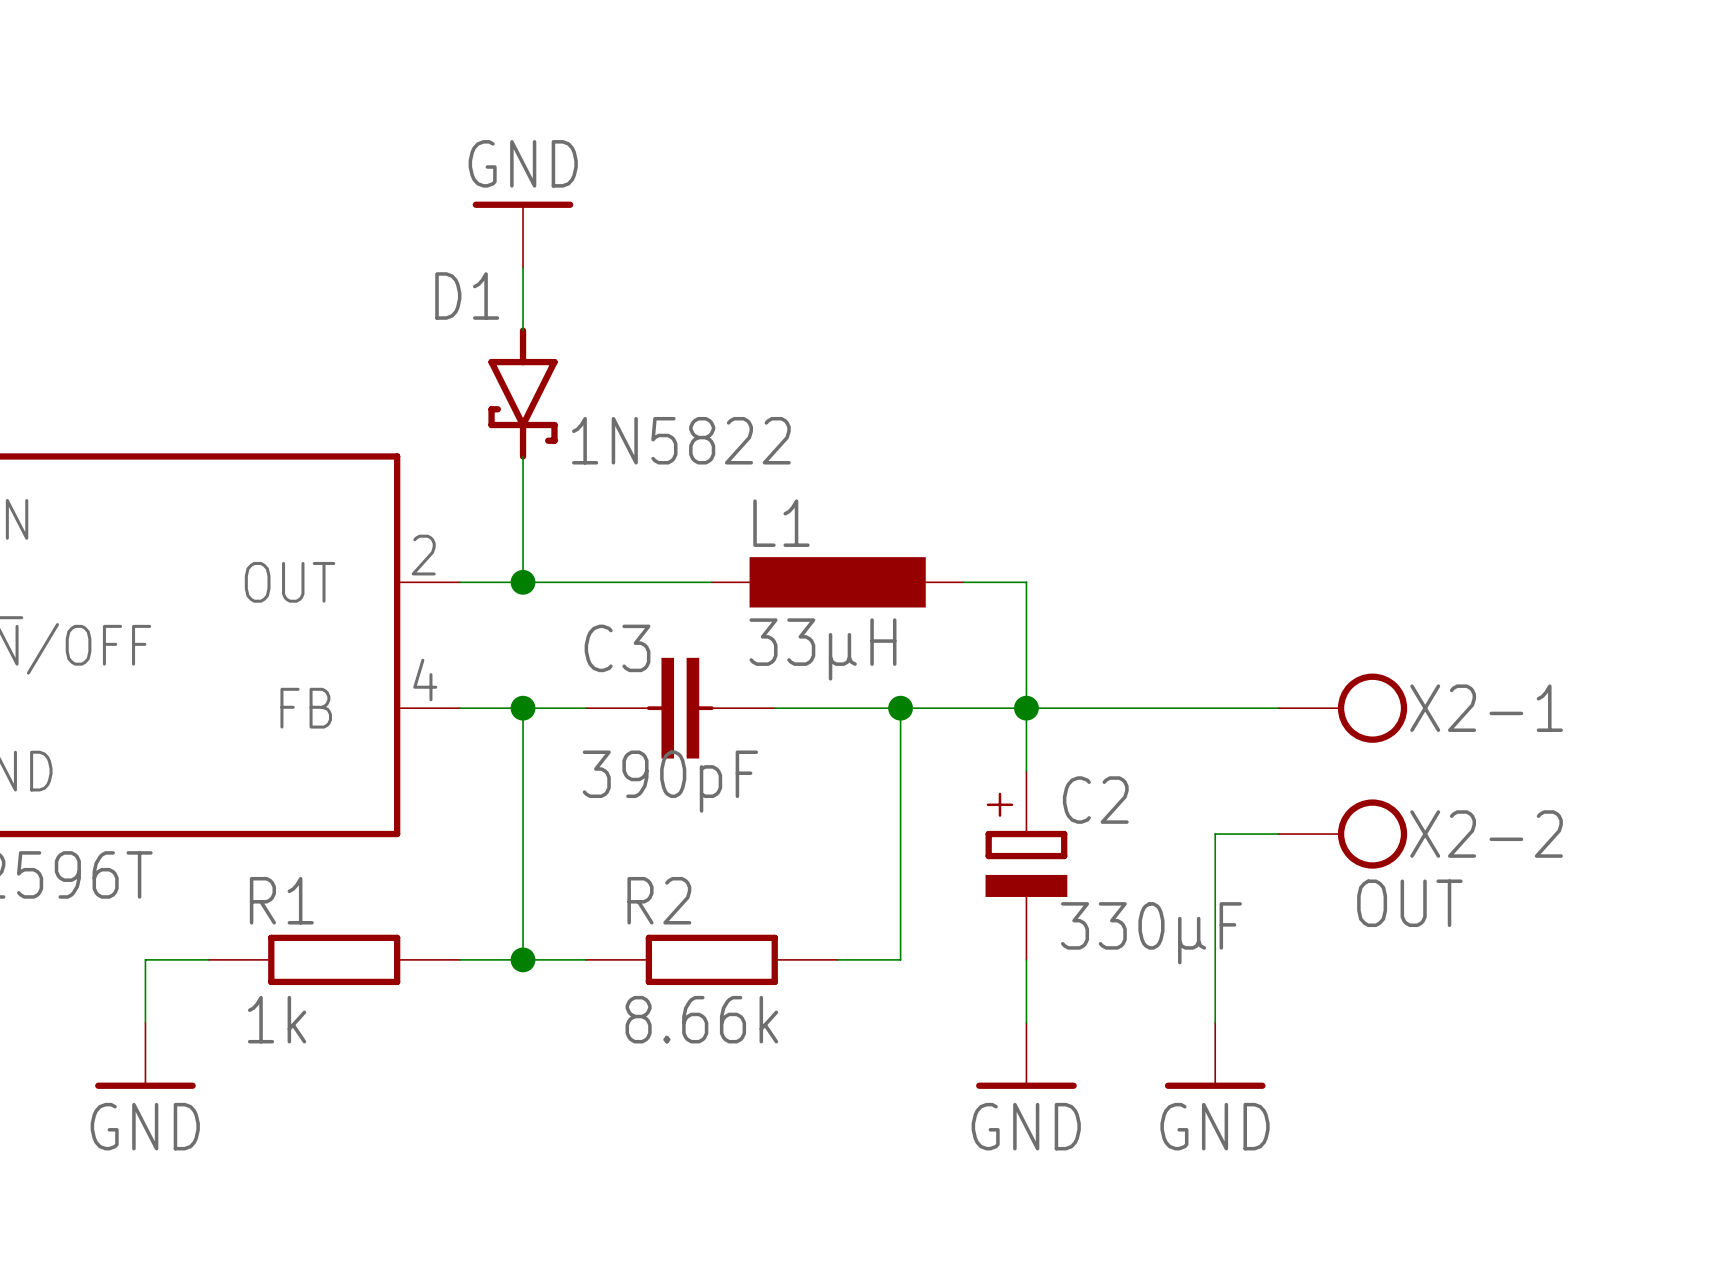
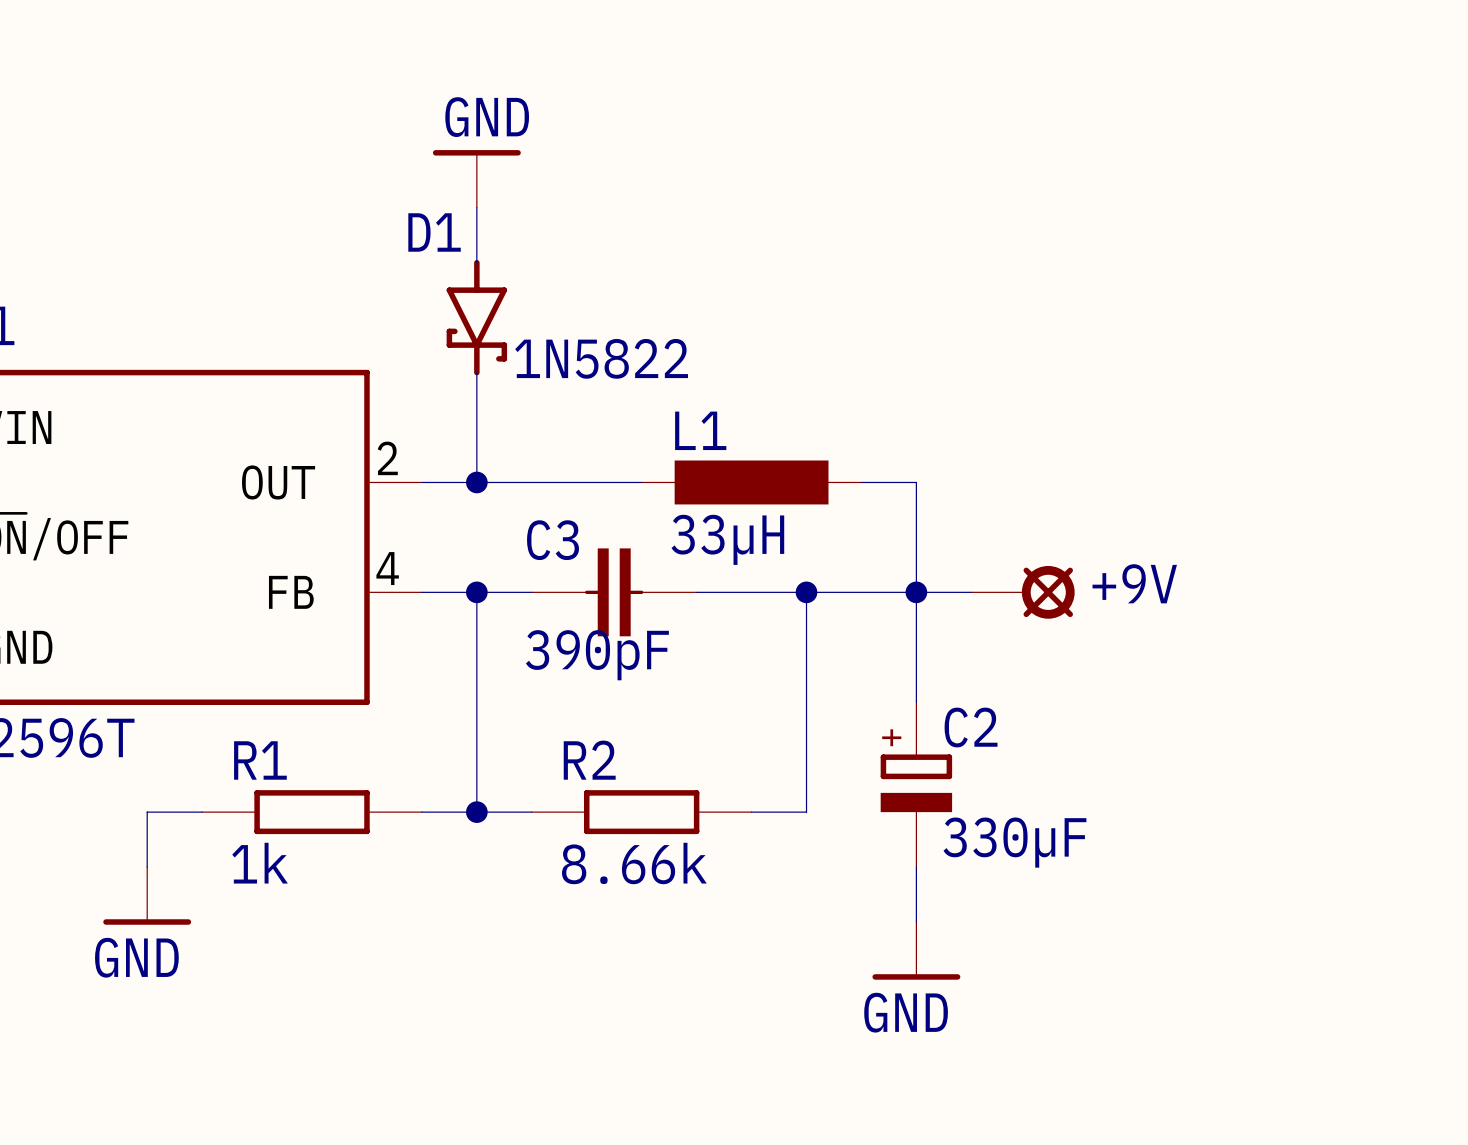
wire: (1089, 708) (1278, 708) -> none
+9V: none -> (1022, 592)
X2-1: (1342, 708) -> none
wire: (1278, 834) (1215, 834) (1215, 1022) -> none
X2-2: OUT (1342, 834) -> none
C2 position: (1026, 865) -> (916, 784)
power symbol position: GND (1026, 1055) -> GND (916, 950)
power symbol: GND (1215, 1055) -> none

